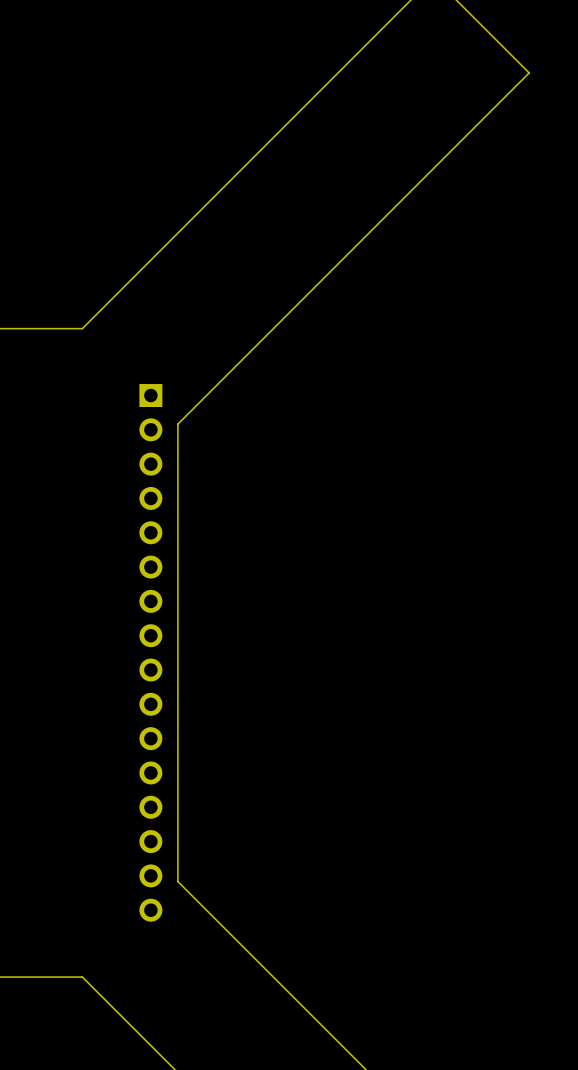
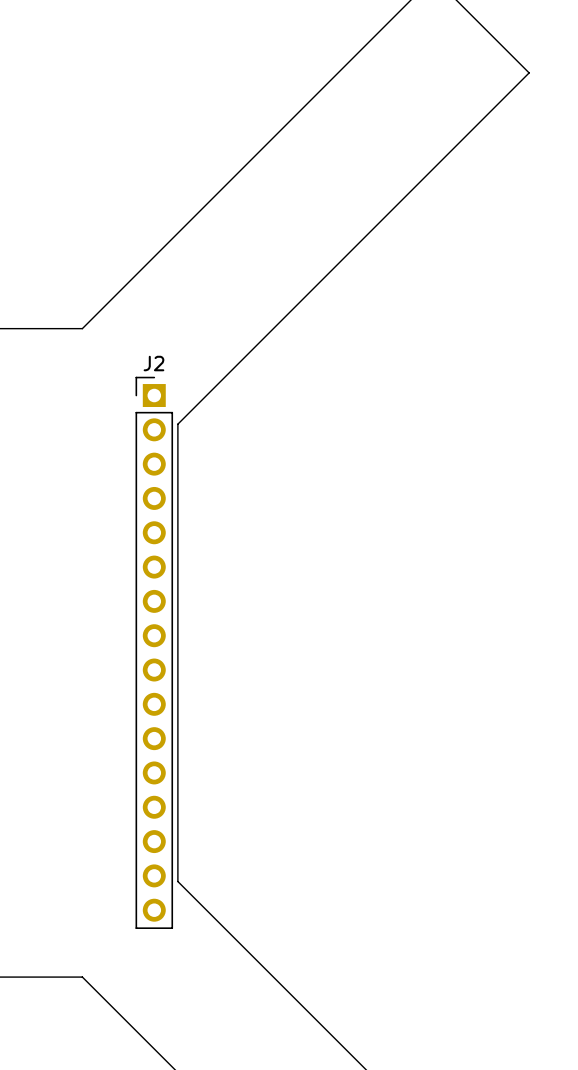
J2 side: top (150, 652) -> bottom (154, 652)

